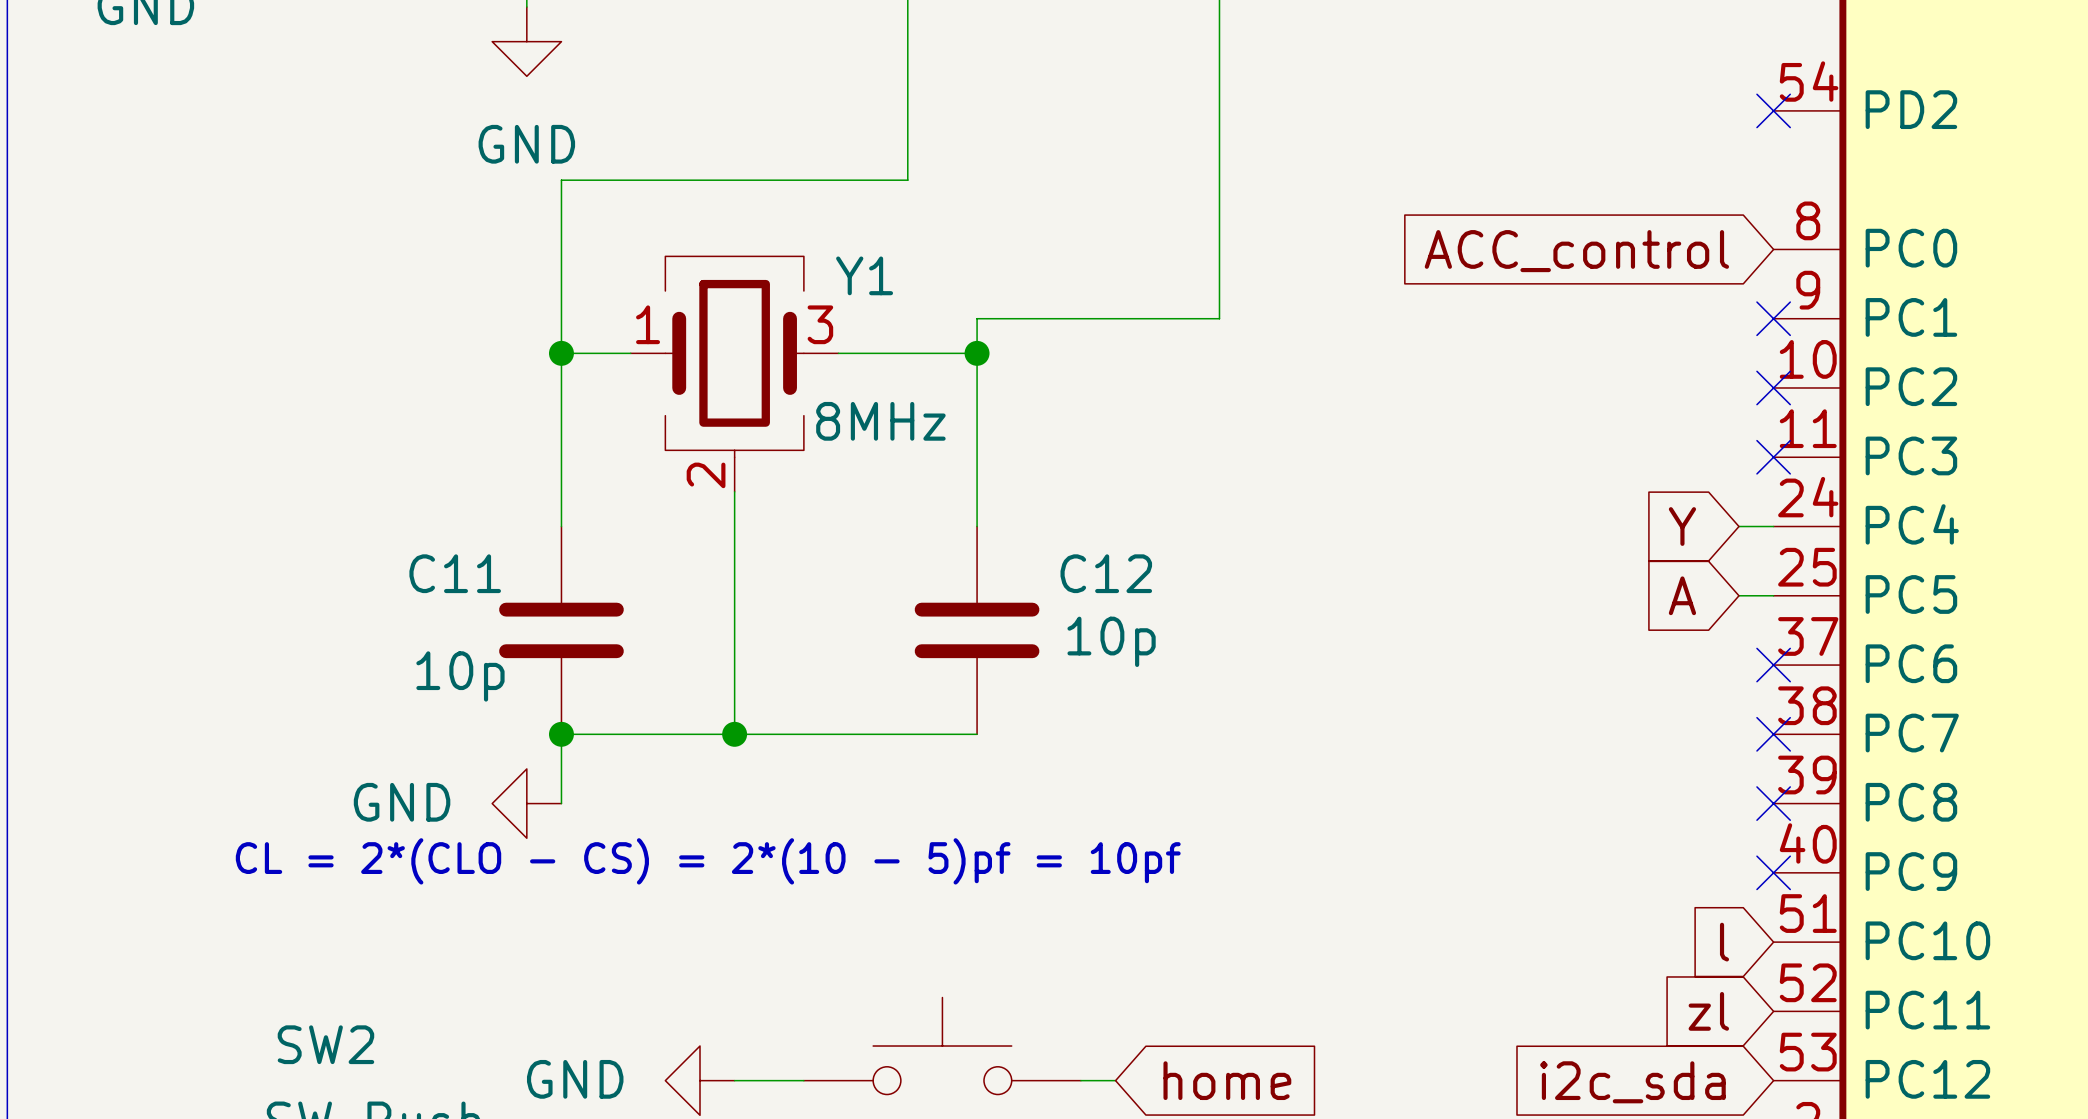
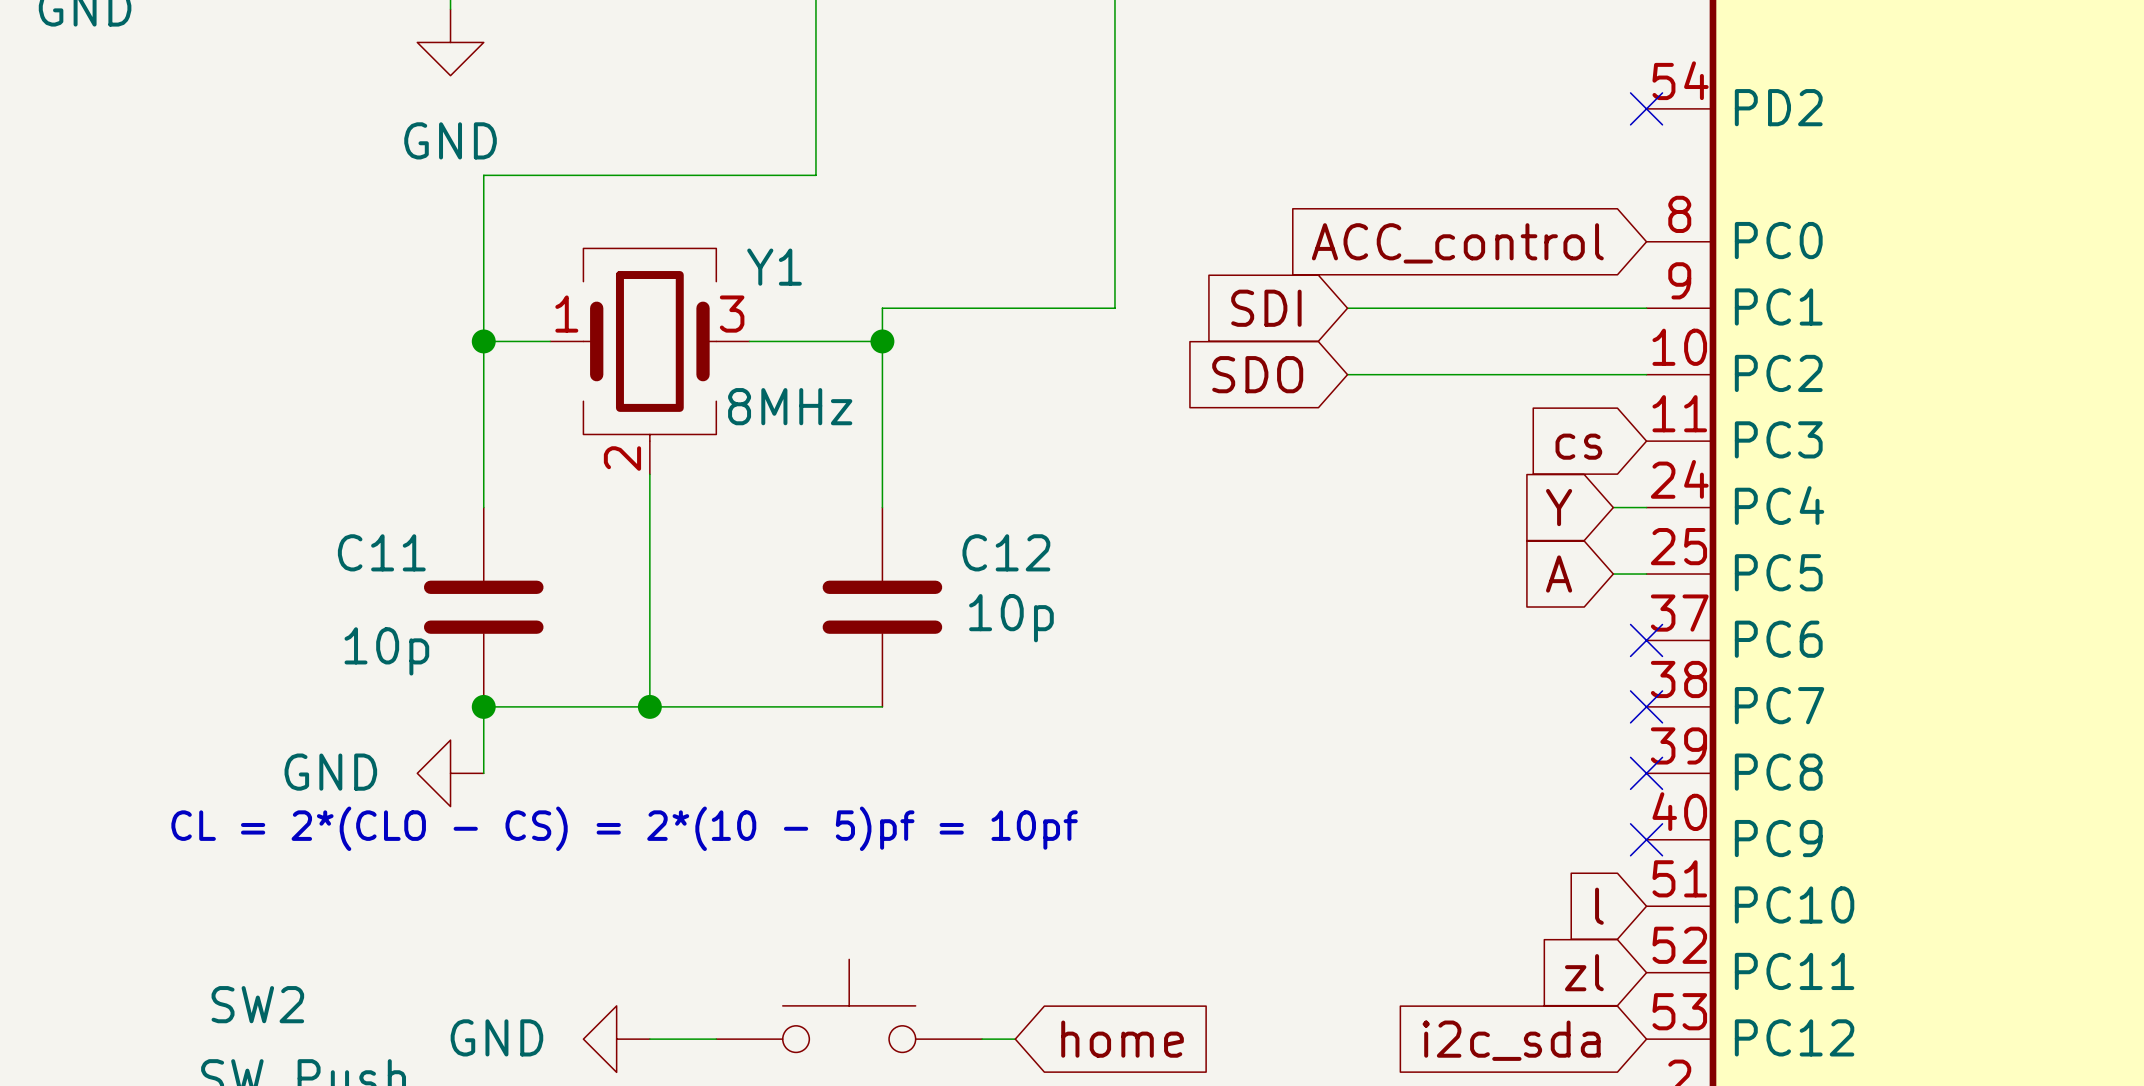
global label: none -> SDI (1266, 308)
wire: none -> (1347, 308) (1646, 308)
no-connect mark: (1773, 318) -> none
global label: none -> SDO (1257, 374)
wire: none -> (1347, 374) (1646, 374)
no-connect mark: (1773, 387) -> none
no-connect mark: (1773, 457) -> none
global label: none -> cs (1578, 446)

